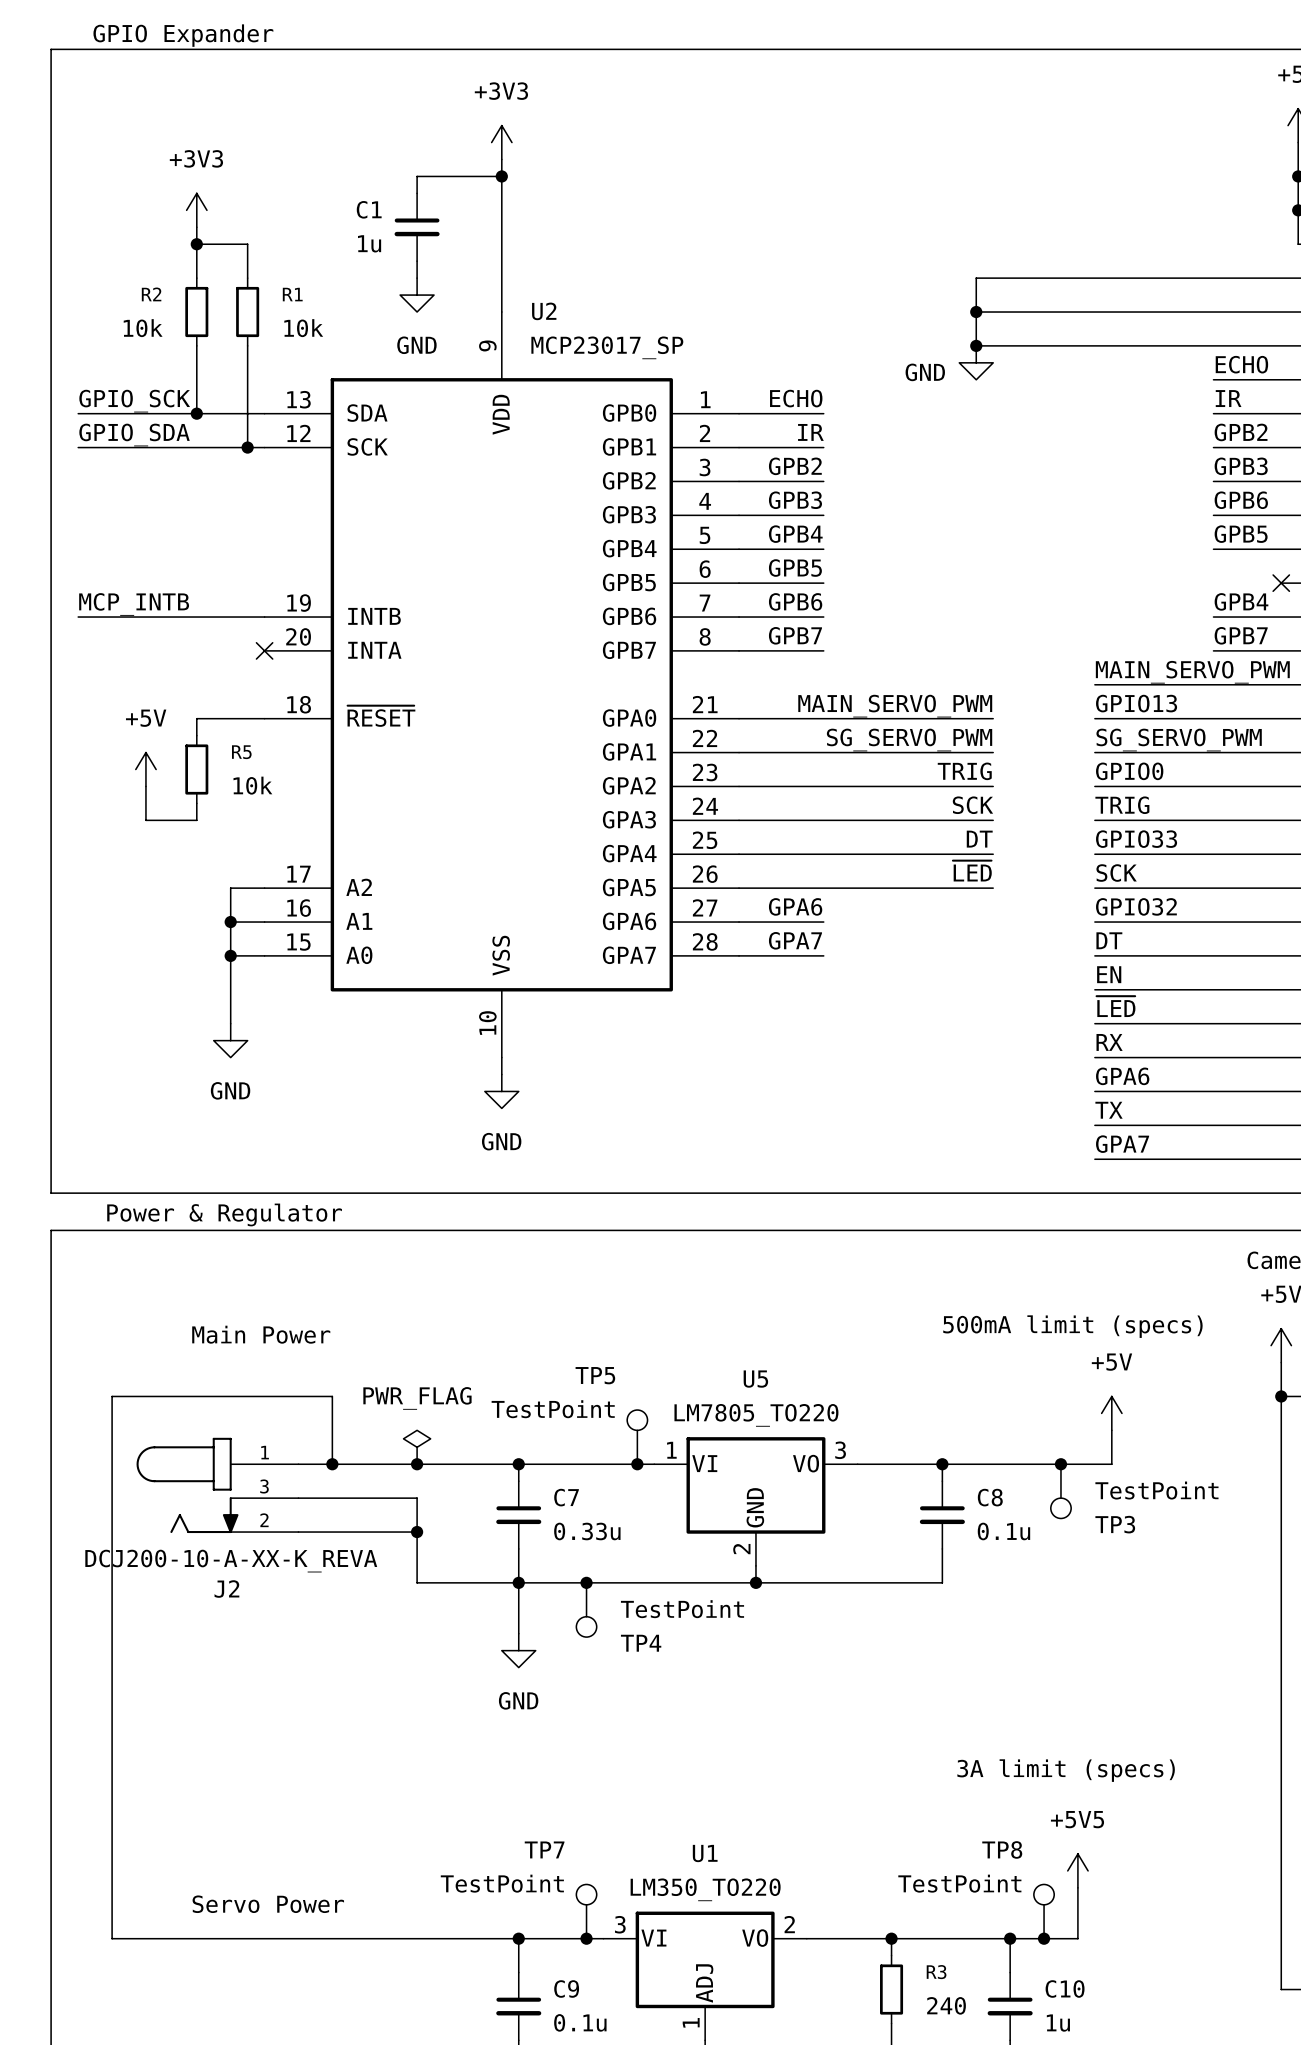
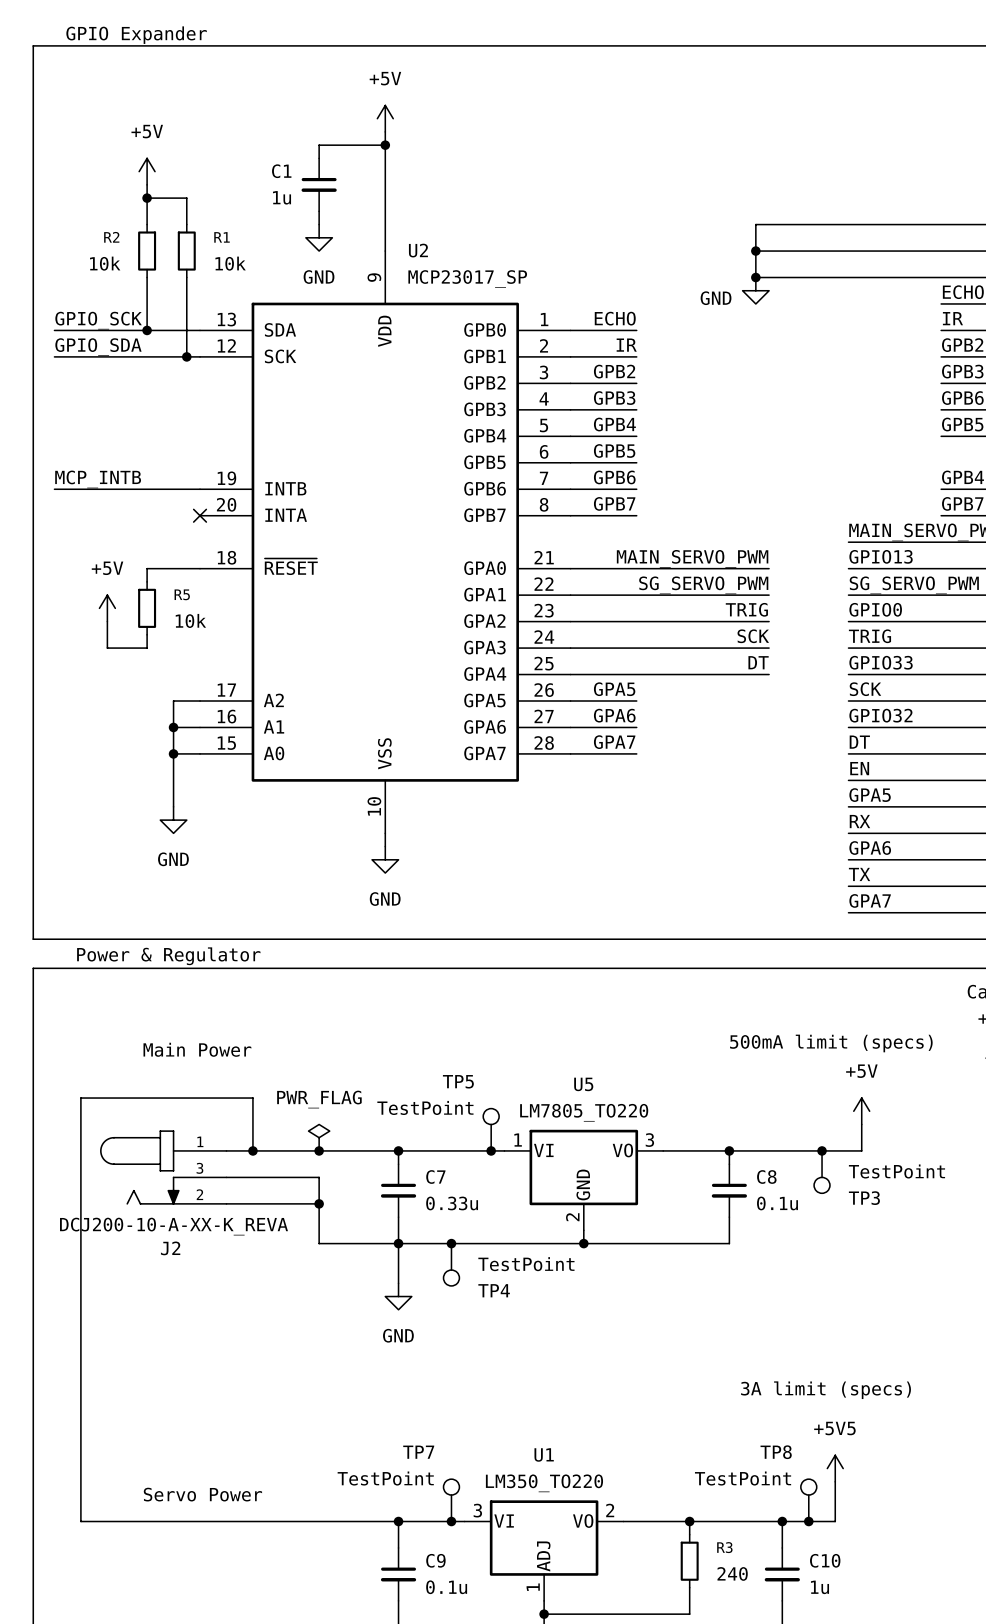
power symbol: +3V3 (501, 142) -> +5V (385, 118)
power symbol: +3V3 (196, 210) -> +5V (147, 171)
label: ~{LED} (972, 871) -> none
label: none -> GPA5 (614, 689)
wire: (823, 888) (993, 888) -> none
label: ~{LED} (1115, 1006) -> GPA5 (870, 795)

